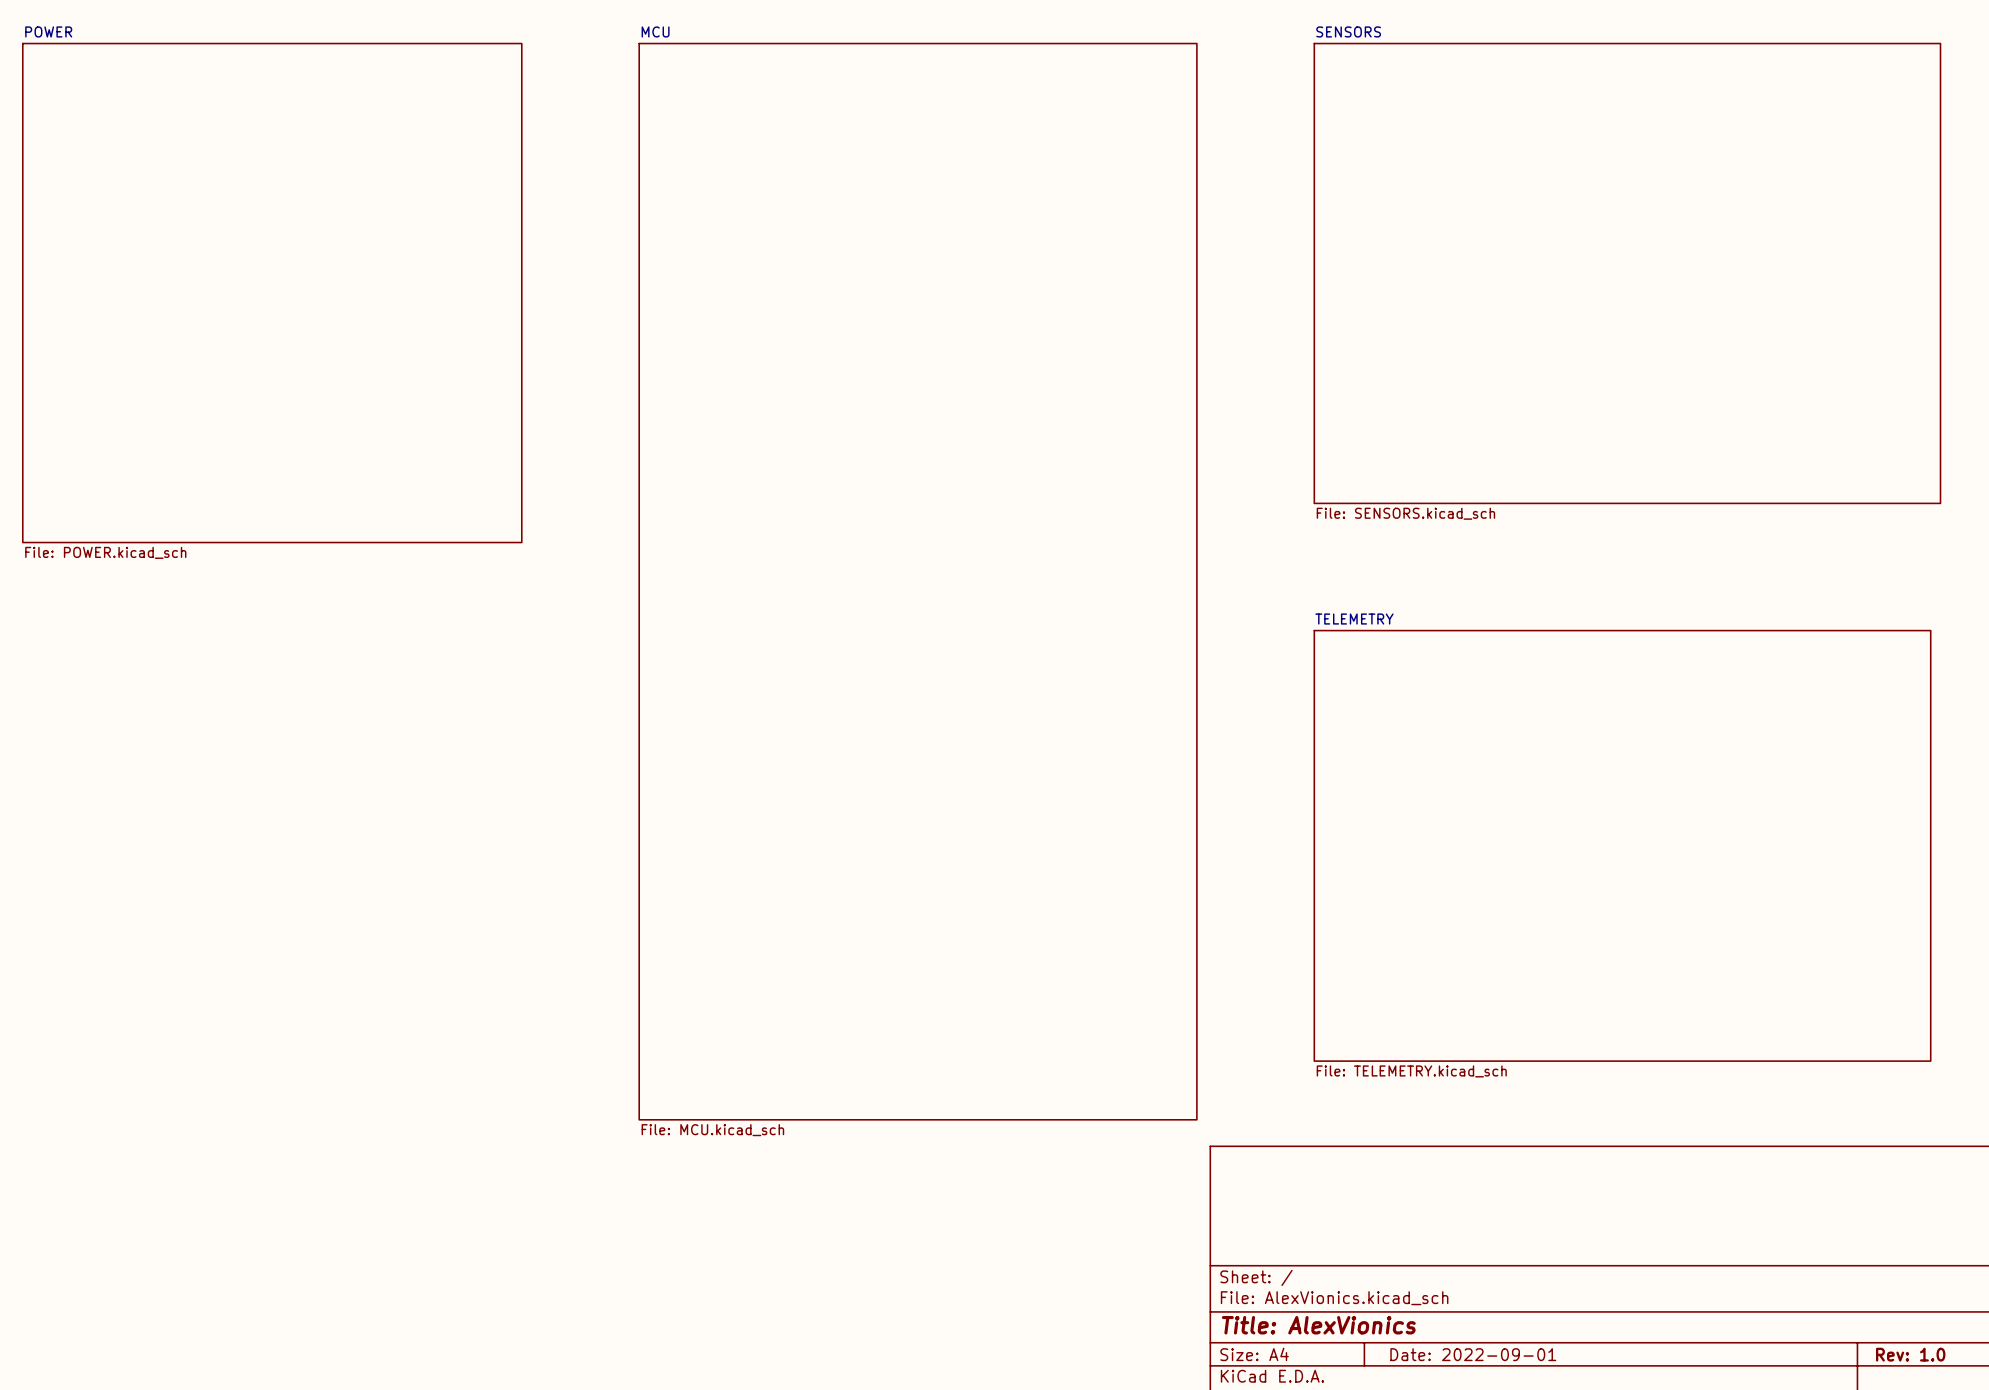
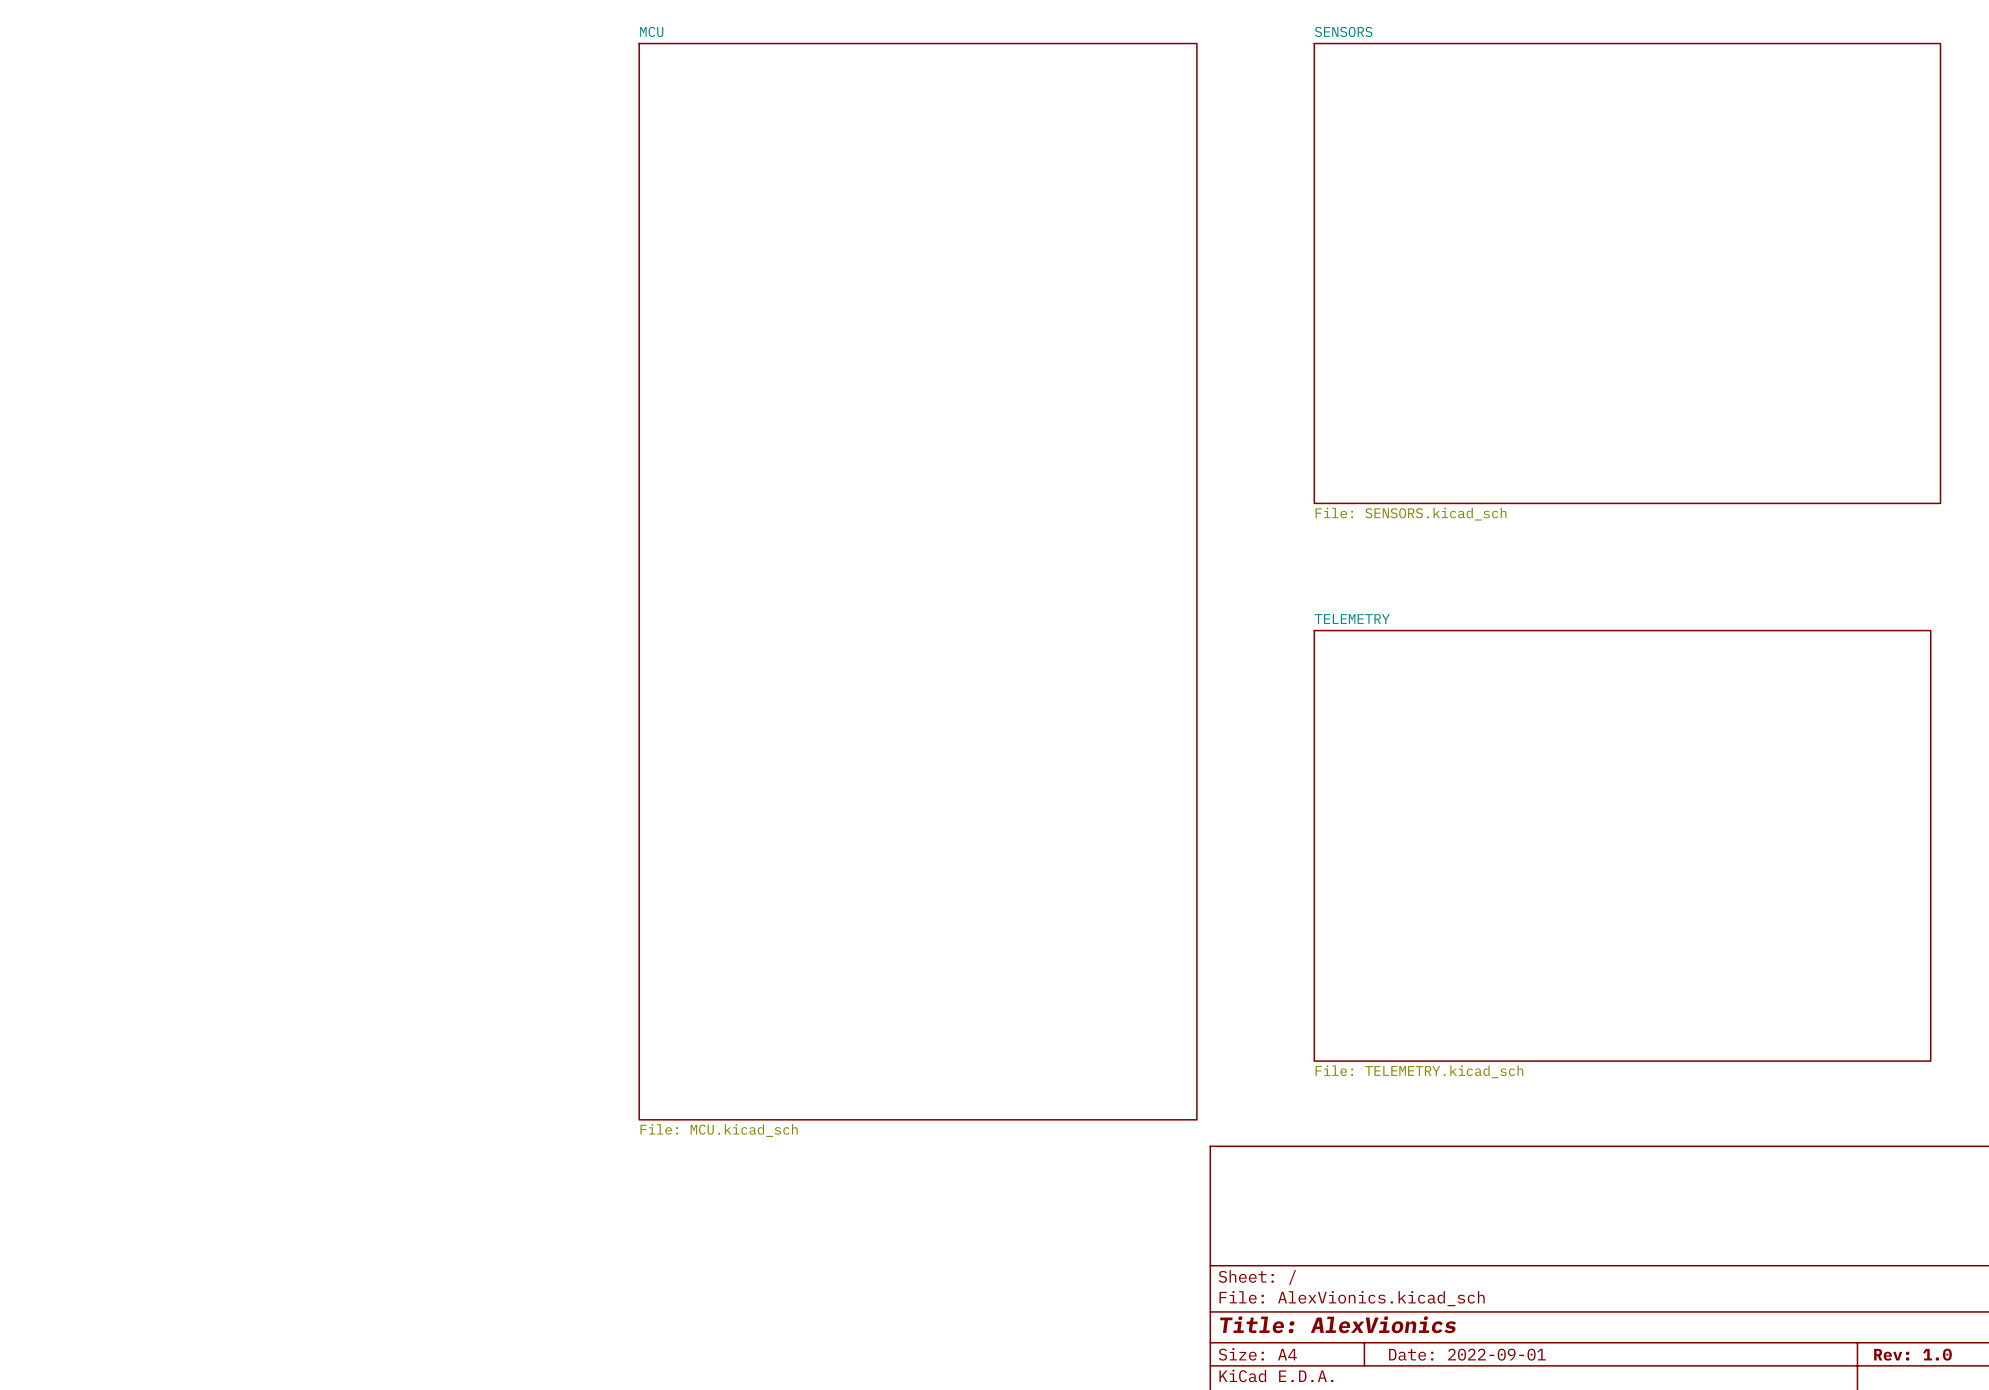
sheet POWER: File: POWER.kicad_sch (272, 293) -> none

